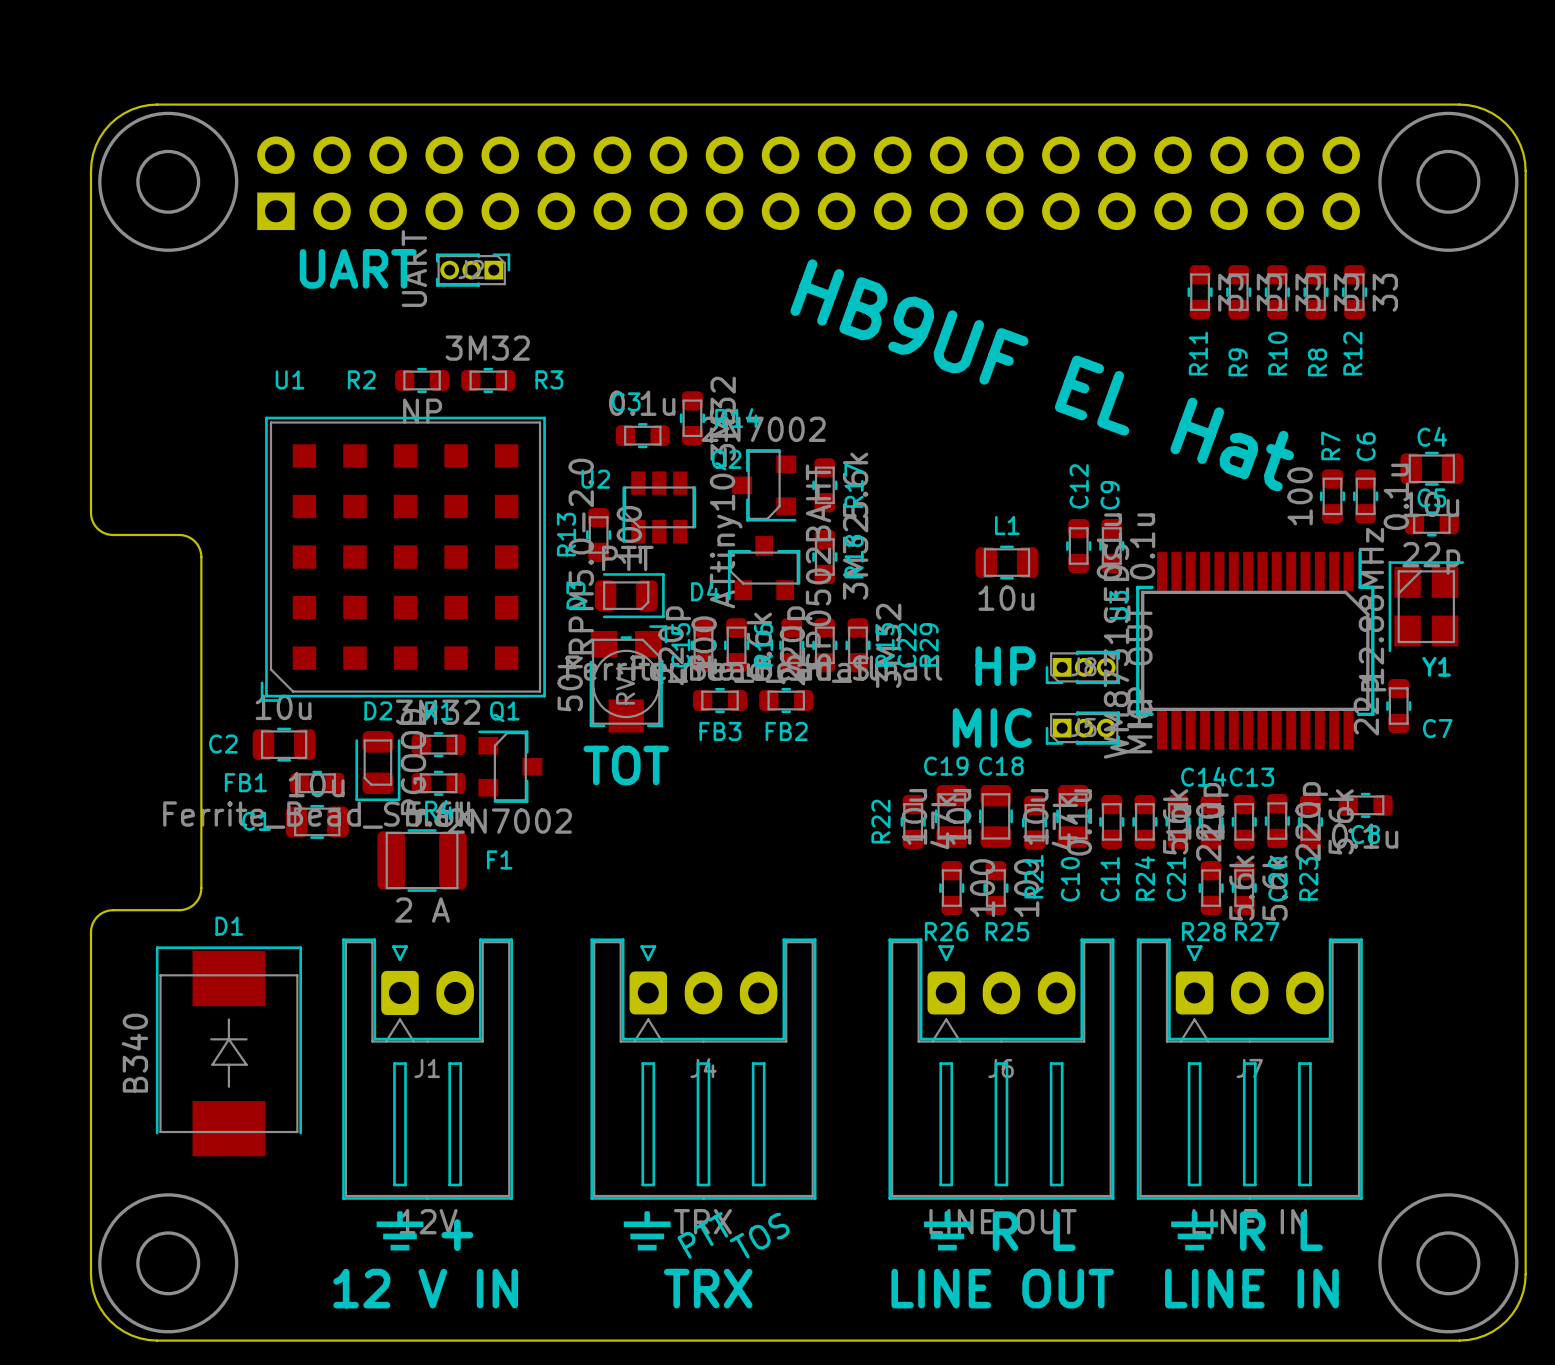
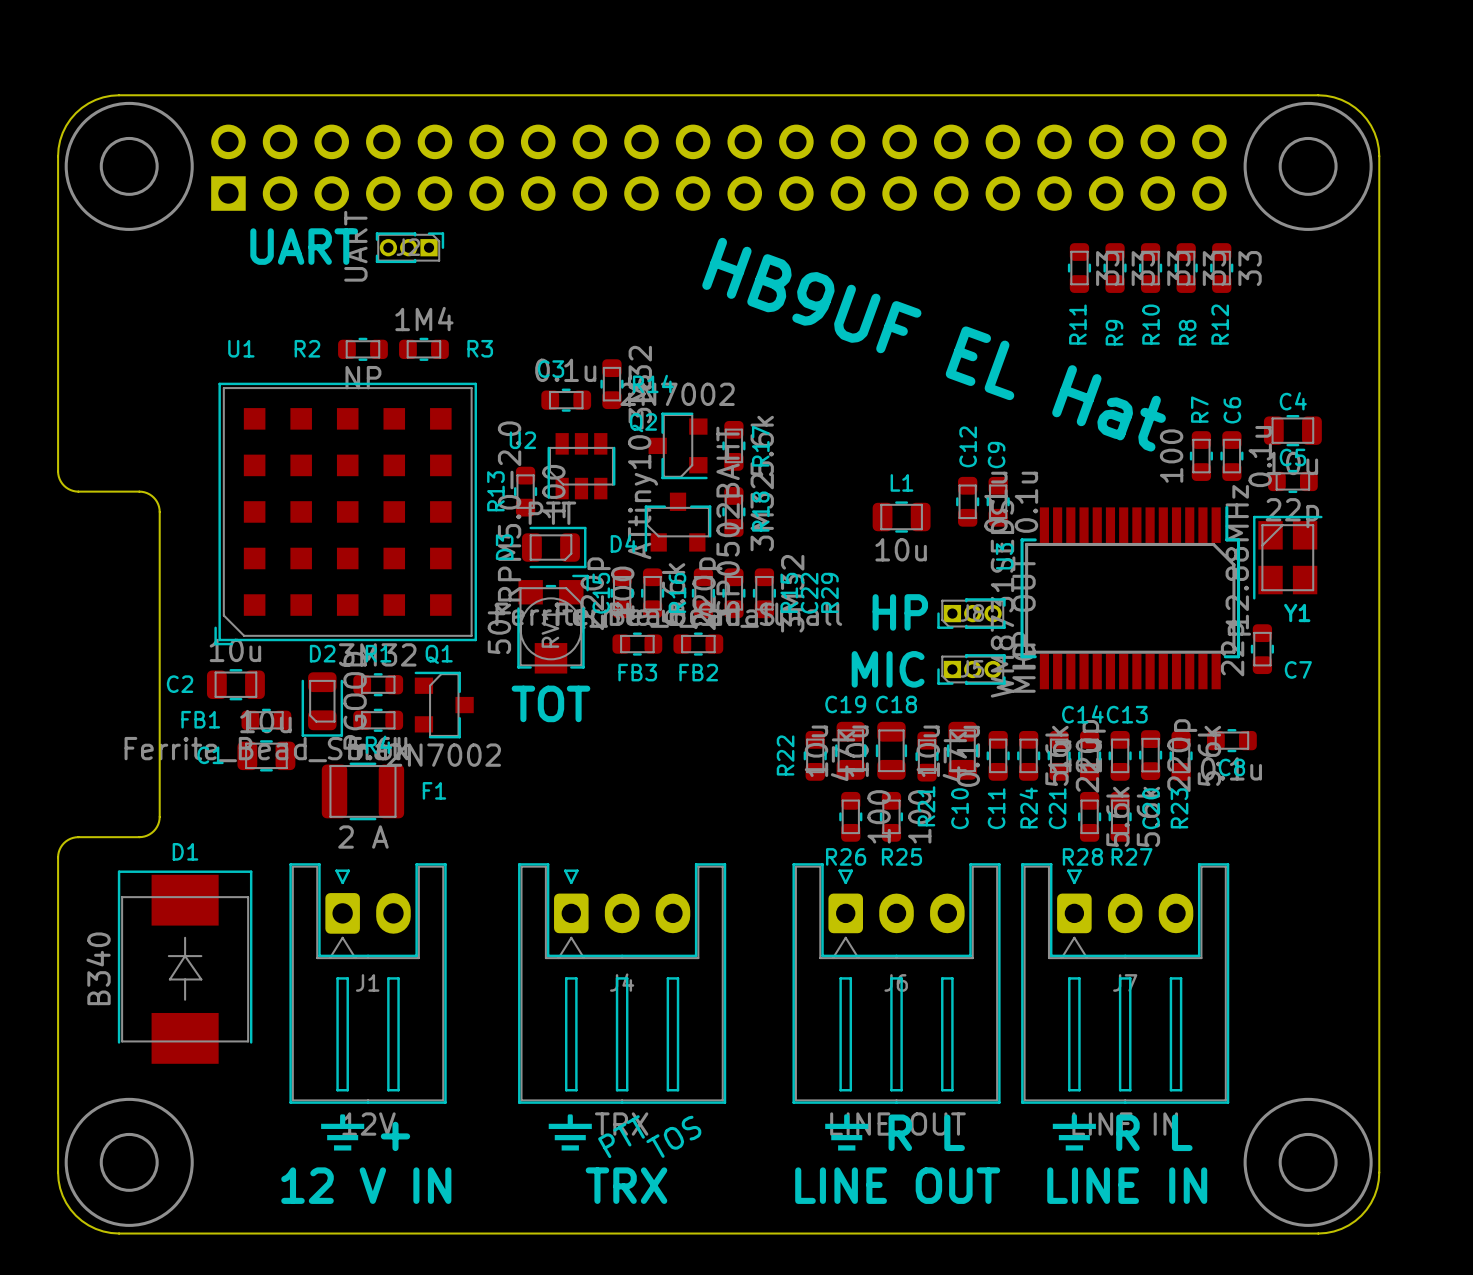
R3 value: 3M32 (487, 348) -> 1M4 (424, 319)

